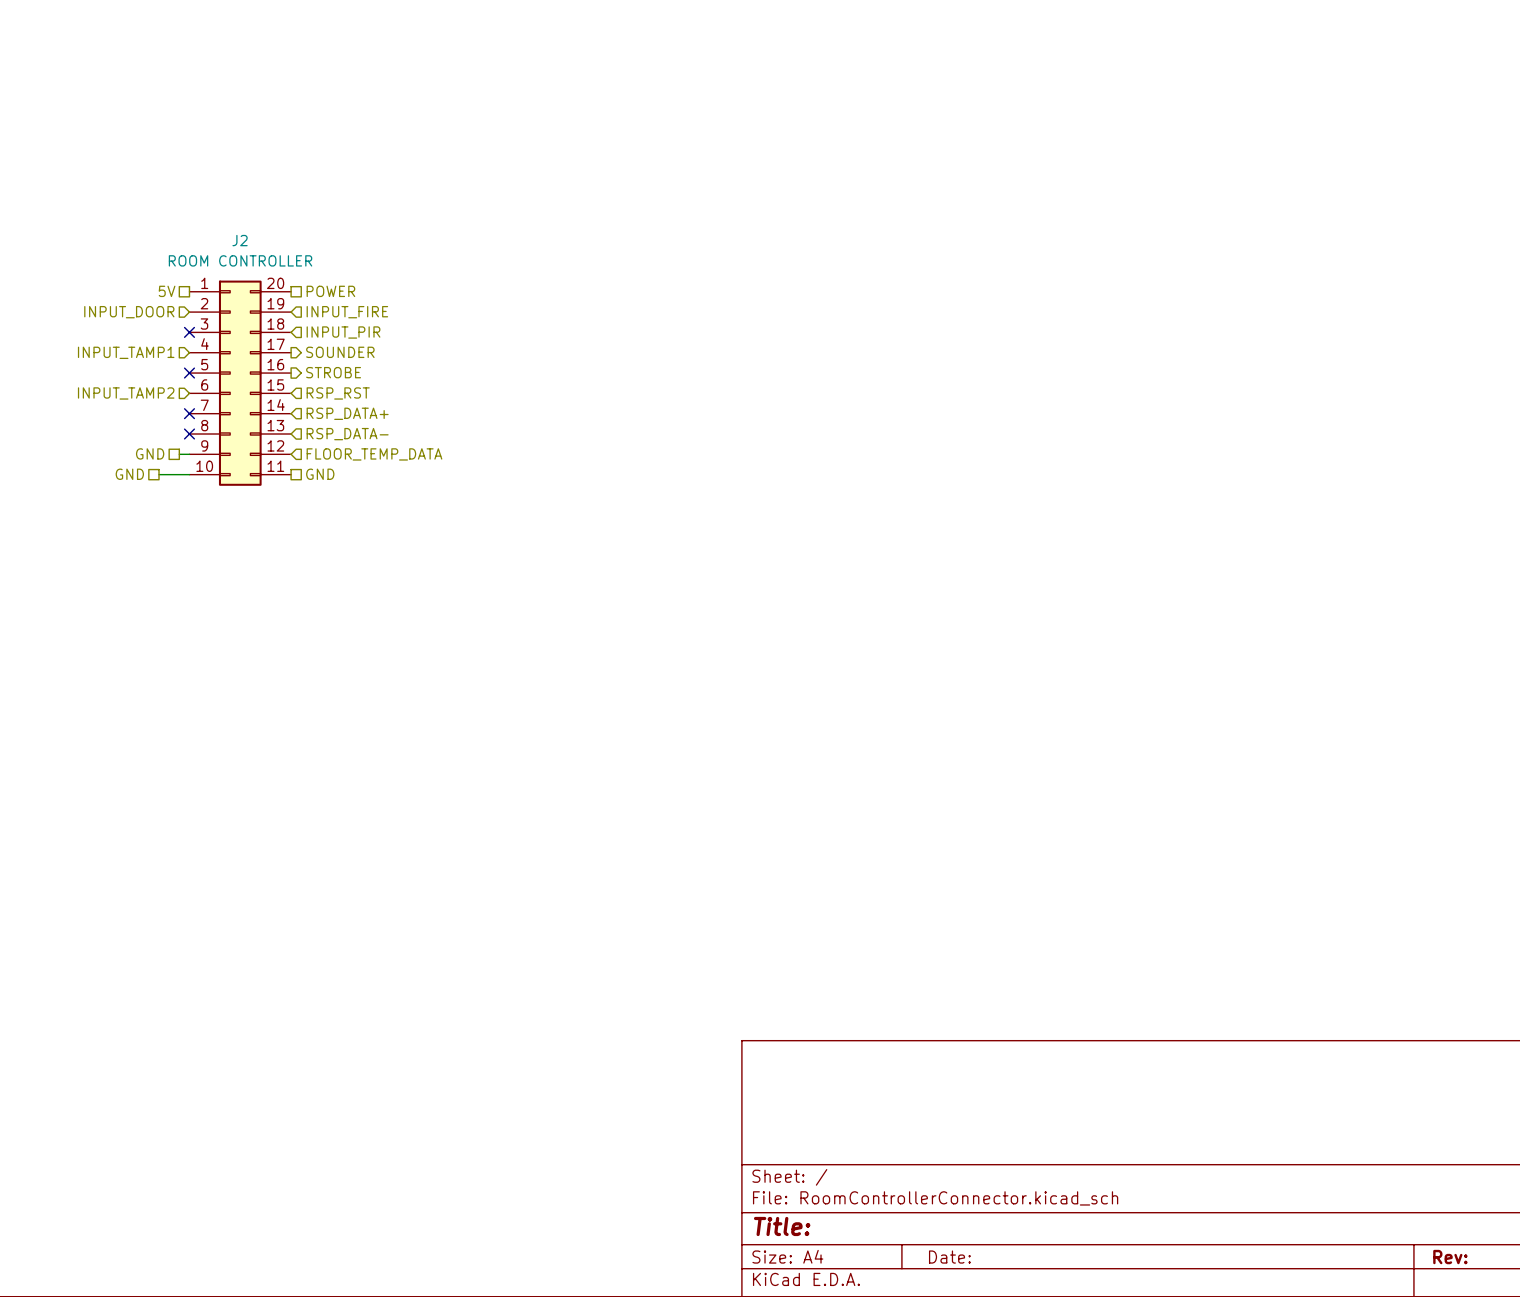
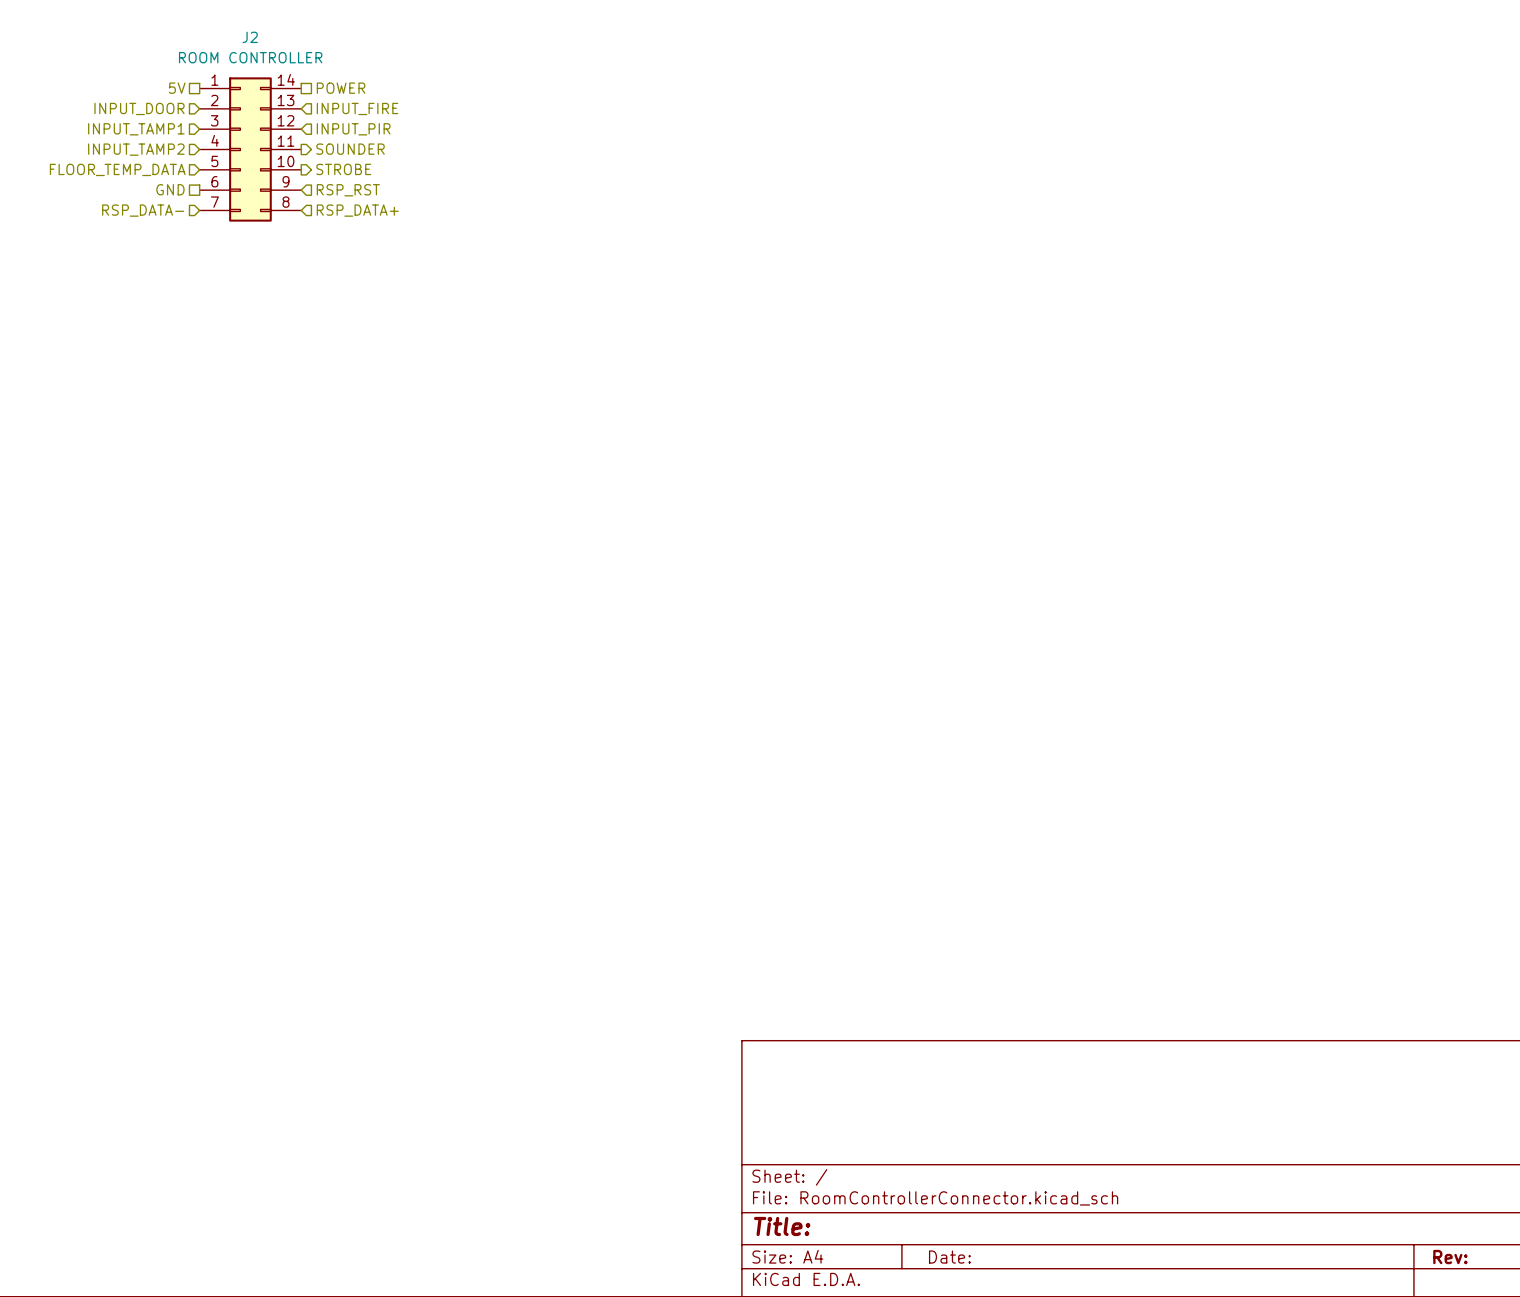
hierarchical label: none -> 5V (177, 88)
hierarchical label: none -> POWER (341, 88)
hierarchical label: none -> INPUT_DOOR (139, 108)
hierarchical label: none -> INPUT_FIRE (357, 108)
hierarchical label: none -> INPUT_TAMP1 (136, 129)
hierarchical label: none -> INPUT_PIR (353, 129)
hierarchical label: none -> INPUT_TAMP2 (136, 149)
hierarchical label: none -> SOUNDER (350, 149)
hierarchical label: none -> FLOOR_TEMP_DATA (117, 169)
hierarchical label: none -> STROBE (343, 169)
hierarchical label: none -> GND (170, 189)
hierarchical label: none -> RSP_RST (348, 190)
hierarchical label: none -> RSP_DATA- (143, 210)
hierarchical label: none -> RSP_DATA+ (357, 210)
J2 name position: J2 (240, 240) -> J2 (250, 37)
J2 value position: ROOM CONTROLLER (240, 260) -> ROOM CONTROLLER (250, 57)
J2 symbol: [189, 280, 292, 486] -> [199, 77, 302, 222]
hierarchical label: 5V (167, 291) -> none
hierarchical label: POWER (330, 291) -> none
hierarchical label: INPUT_DOOR (129, 312) -> none
hierarchical label: INPUT_FIRE (347, 312) -> none
no-connect mark: (189, 332) -> none
hierarchical label: INPUT_PIR (343, 332) -> none
hierarchical label: INPUT_TAMP1 (126, 352) -> none
hierarchical label: SOUNDER (340, 352) -> none
hierarchical label: STROBE (333, 372) -> none
no-connect mark: (189, 373) -> none
hierarchical label: INPUT_TAMP2 (126, 393) -> none
hierarchical label: RSP_RST (338, 393) -> none
no-connect mark: (189, 413) -> none
hierarchical label: RSP_DATA+ (347, 413) -> none
no-connect mark: (189, 434) -> none
hierarchical label: RSP_DATA- (347, 434) -> none
hierarchical label: GND (150, 453) -> none
wire: (179, 454) (189, 454) -> none
hierarchical label: FLOOR_TEMP_DATA (374, 454) -> none
hierarchical label: GND (129, 474) -> none
wire: (159, 474) (189, 474) -> none
hierarchical label: GND (320, 474) -> none

